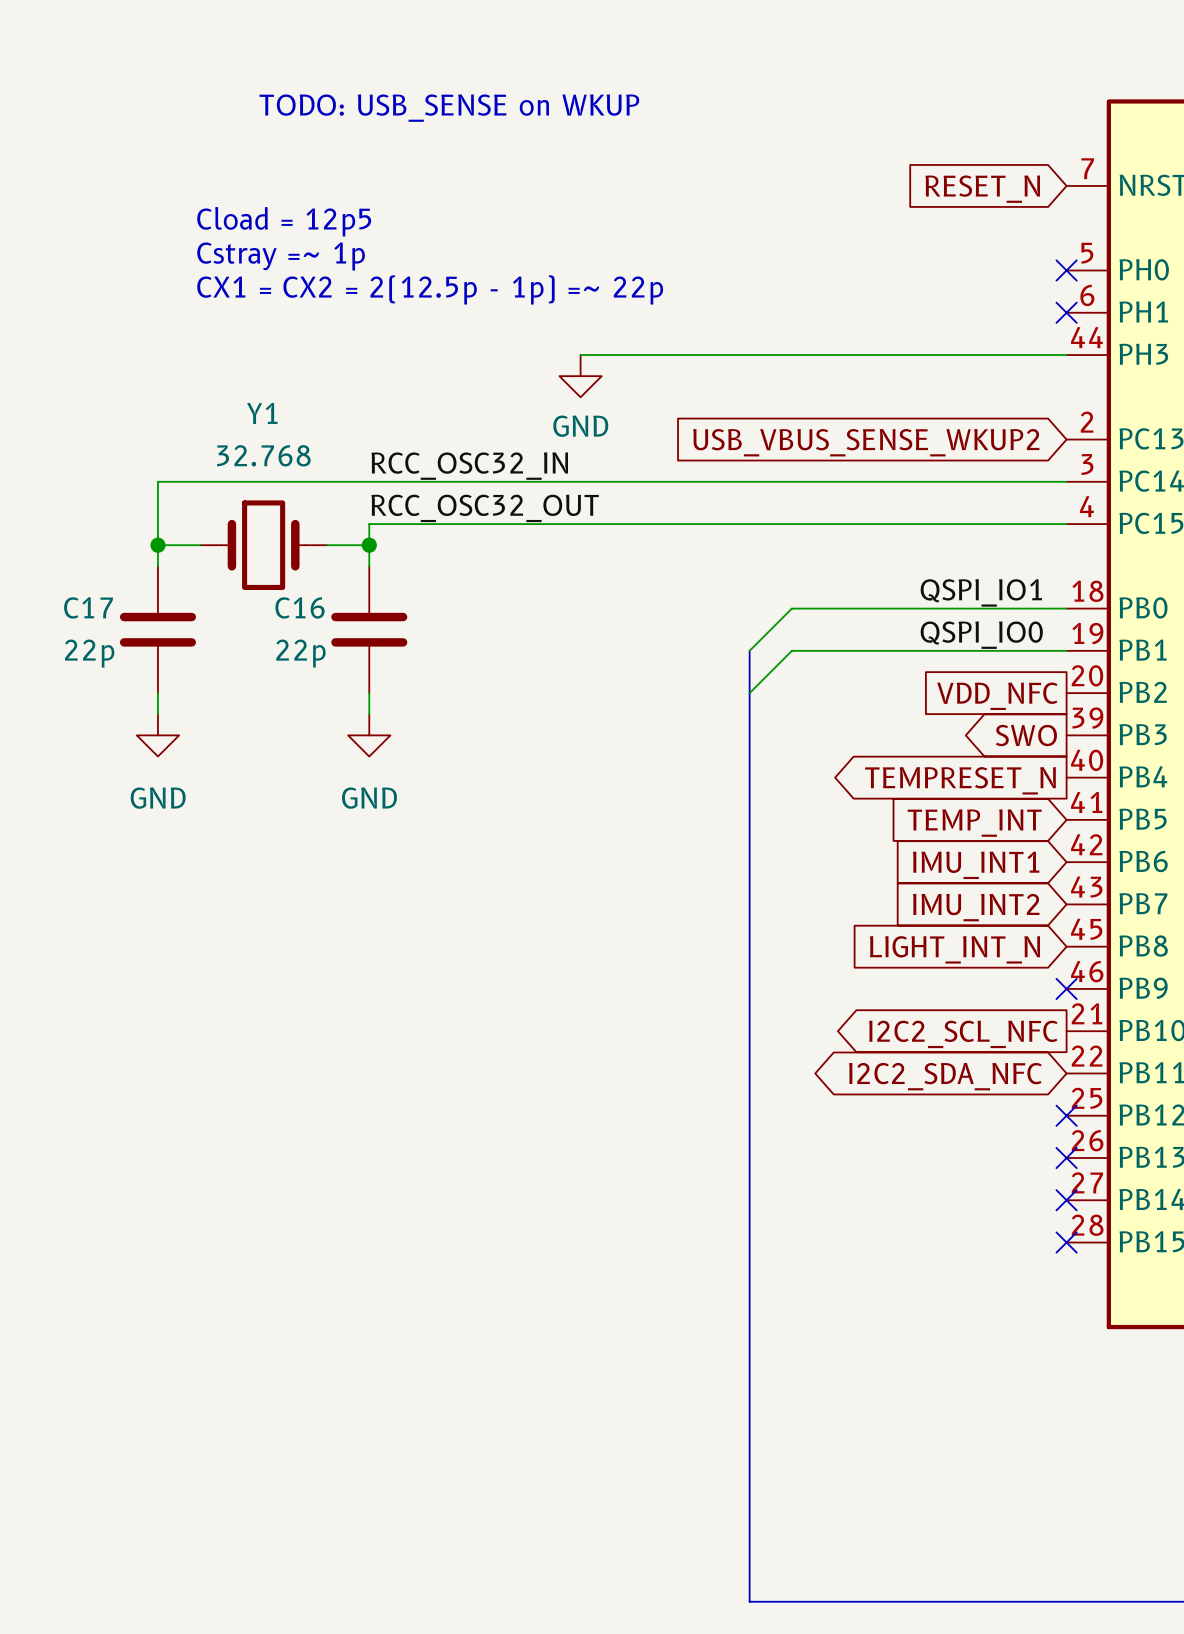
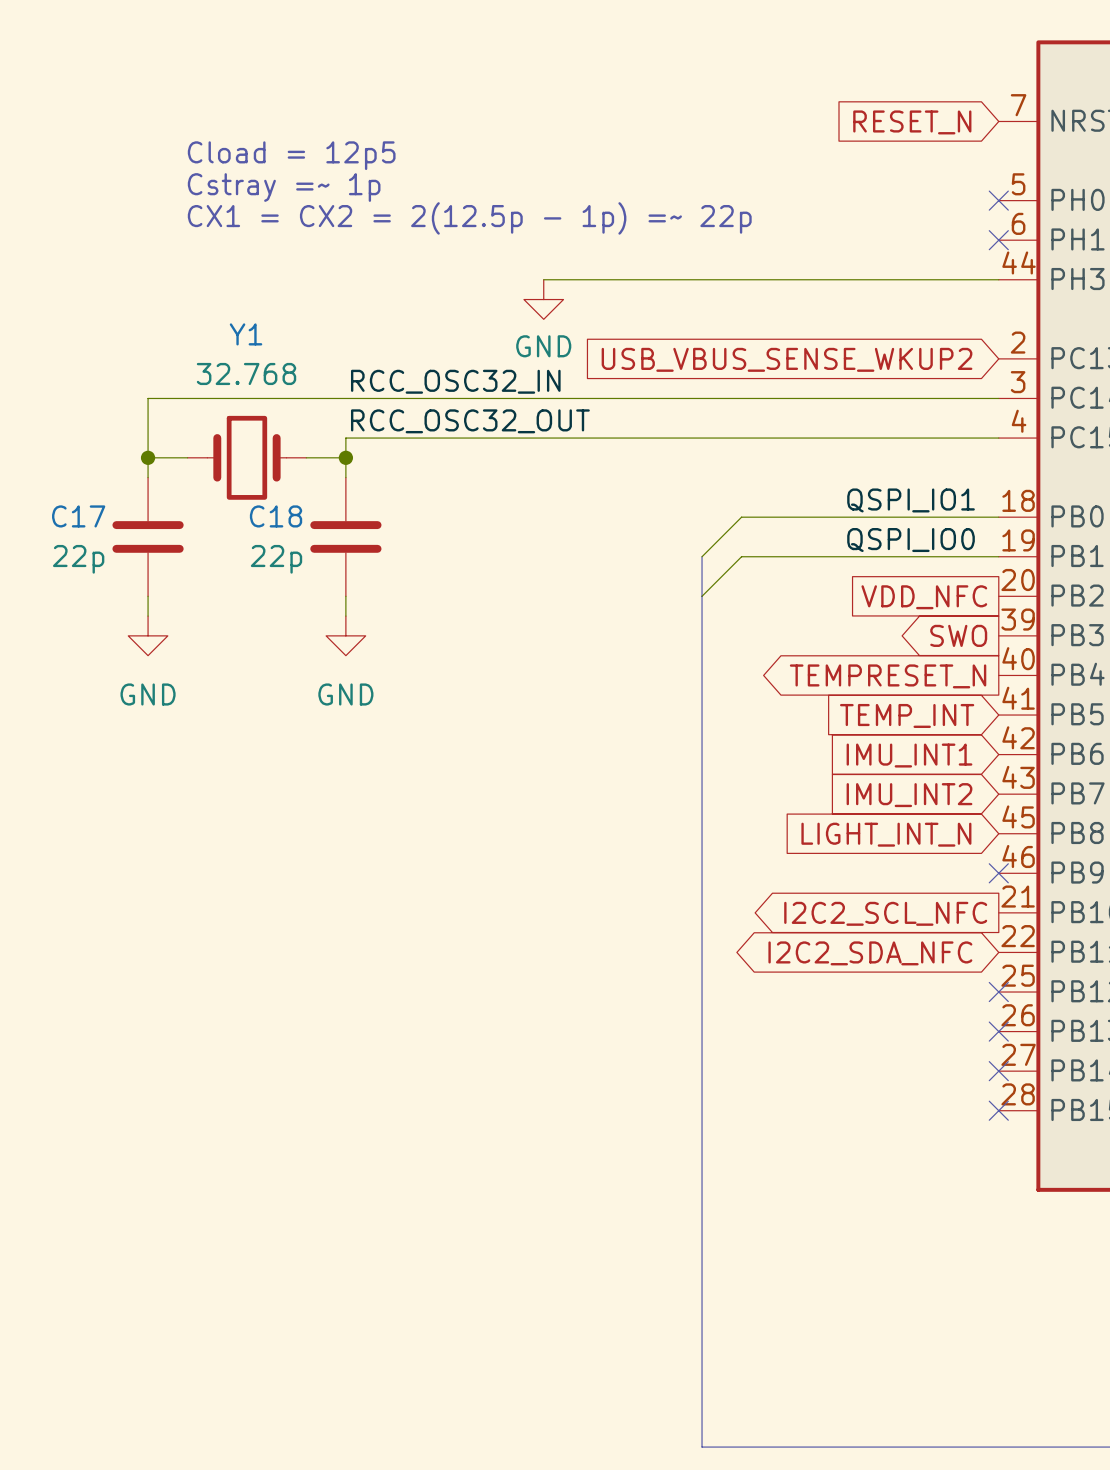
text: TODO: USB_SENSE on WKUP (449, 108) -> none
C16 name: C16 (300, 607) -> C18 (276, 516)

